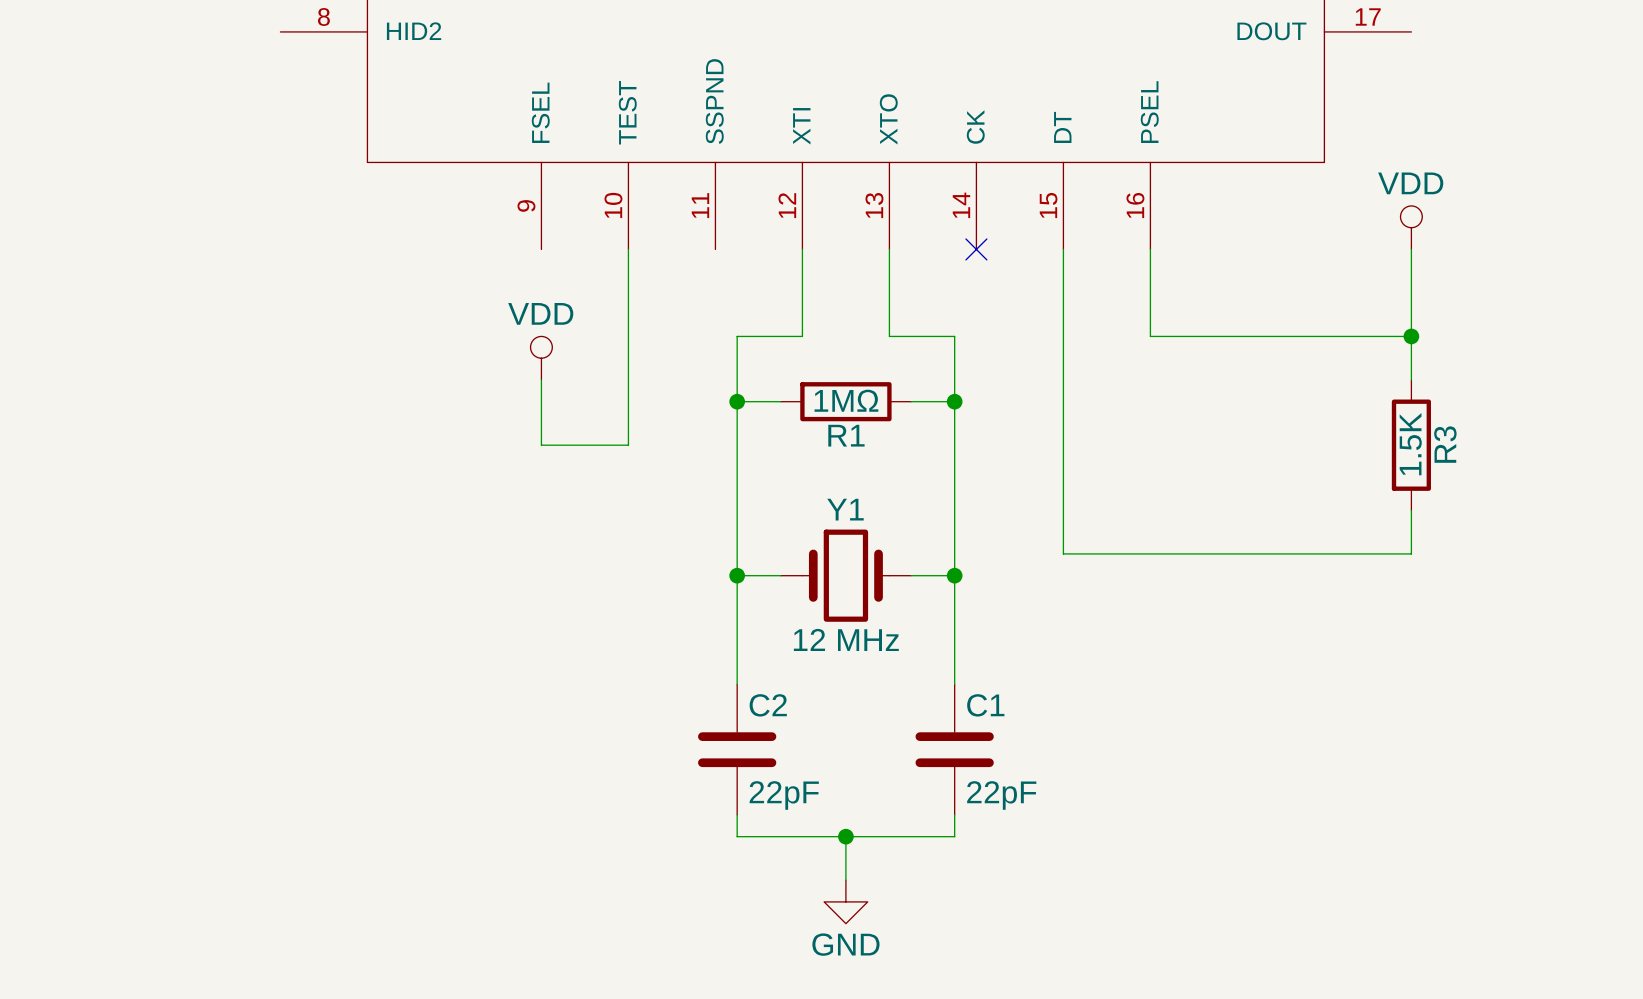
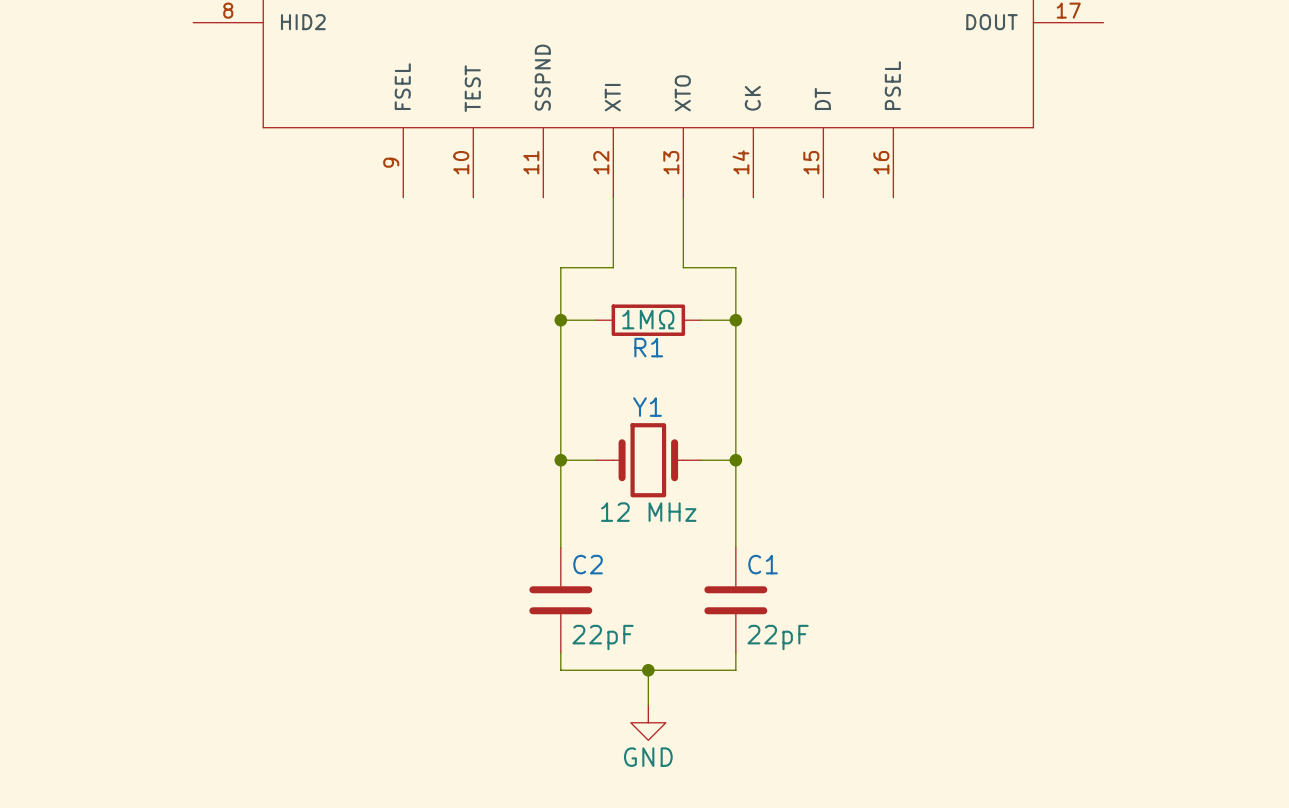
power symbol: VDD (1411, 227) -> none
wire: (628, 249) (628, 445) (541, 445) (541, 379) -> none
no-connect mark: (976, 249) -> none
wire: (1063, 249) (1063, 553) (1411, 553) (1411, 510) -> none
wire: (1150, 249) (1150, 336) (1411, 336) -> none
wire: (1411, 249) (1411, 379) -> none
junction: (1411, 336) -> none
power symbol: VDD (541, 358) -> none
R3: 1.5K (1411, 445) -> none

